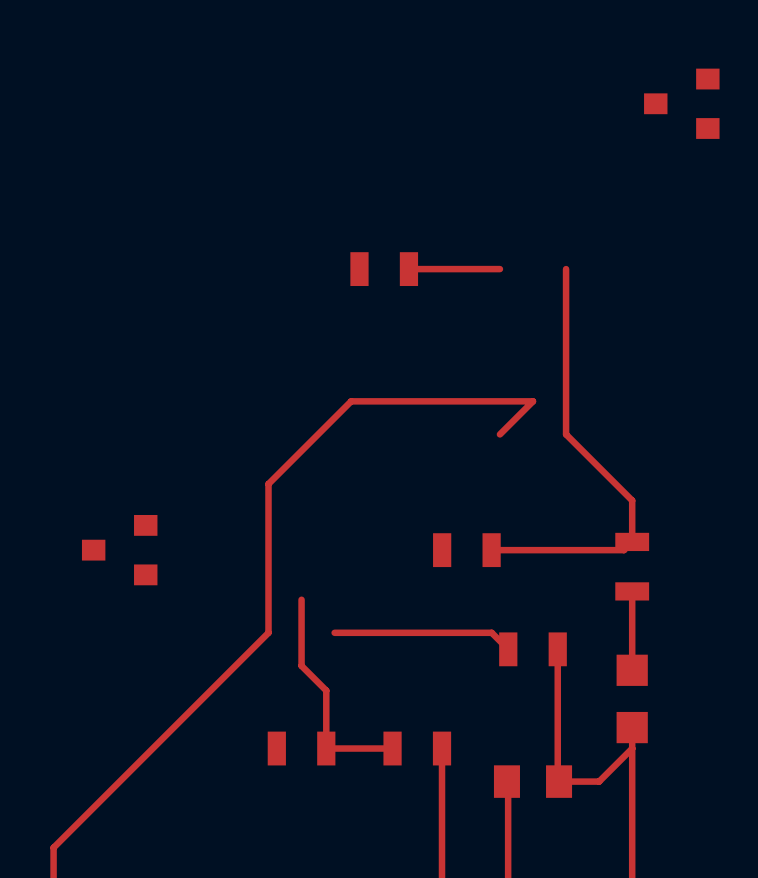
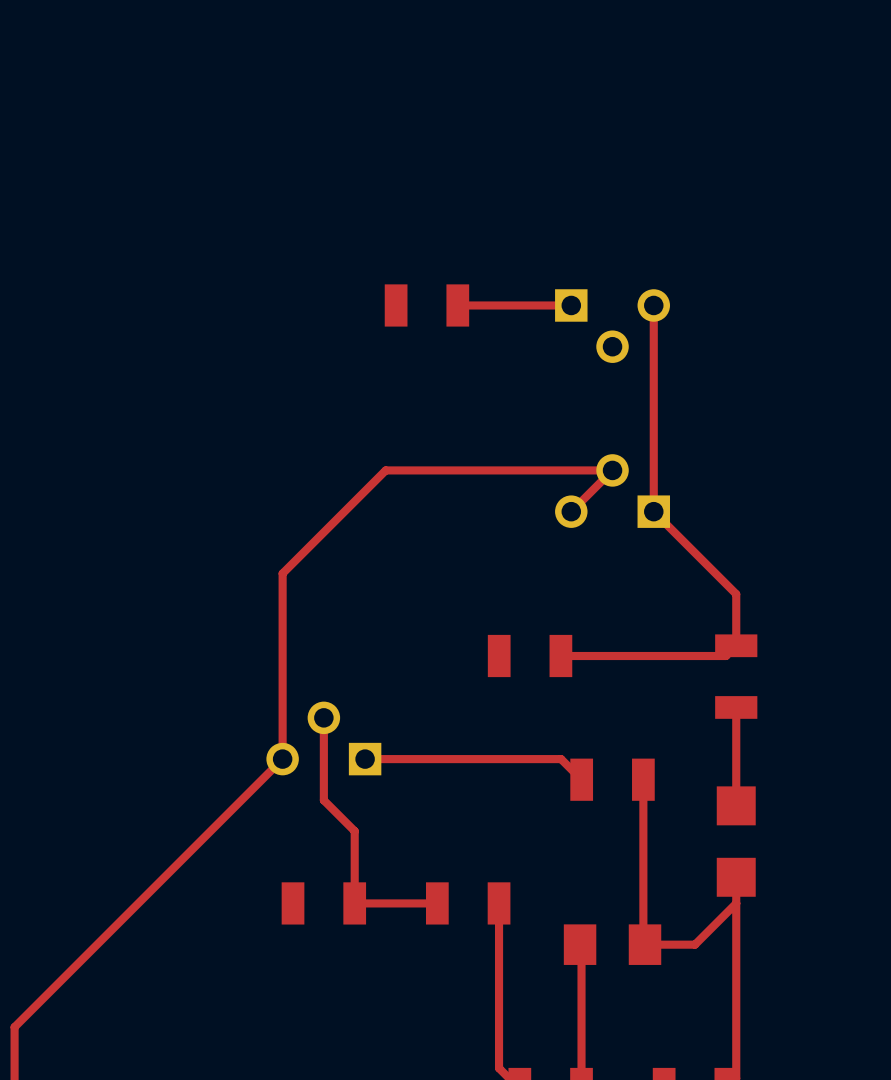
part: (681, 103) -> none
part: none -> (612, 326)
part: none -> (612, 491)
part: (119, 550) -> none
part: none -> (323, 738)

